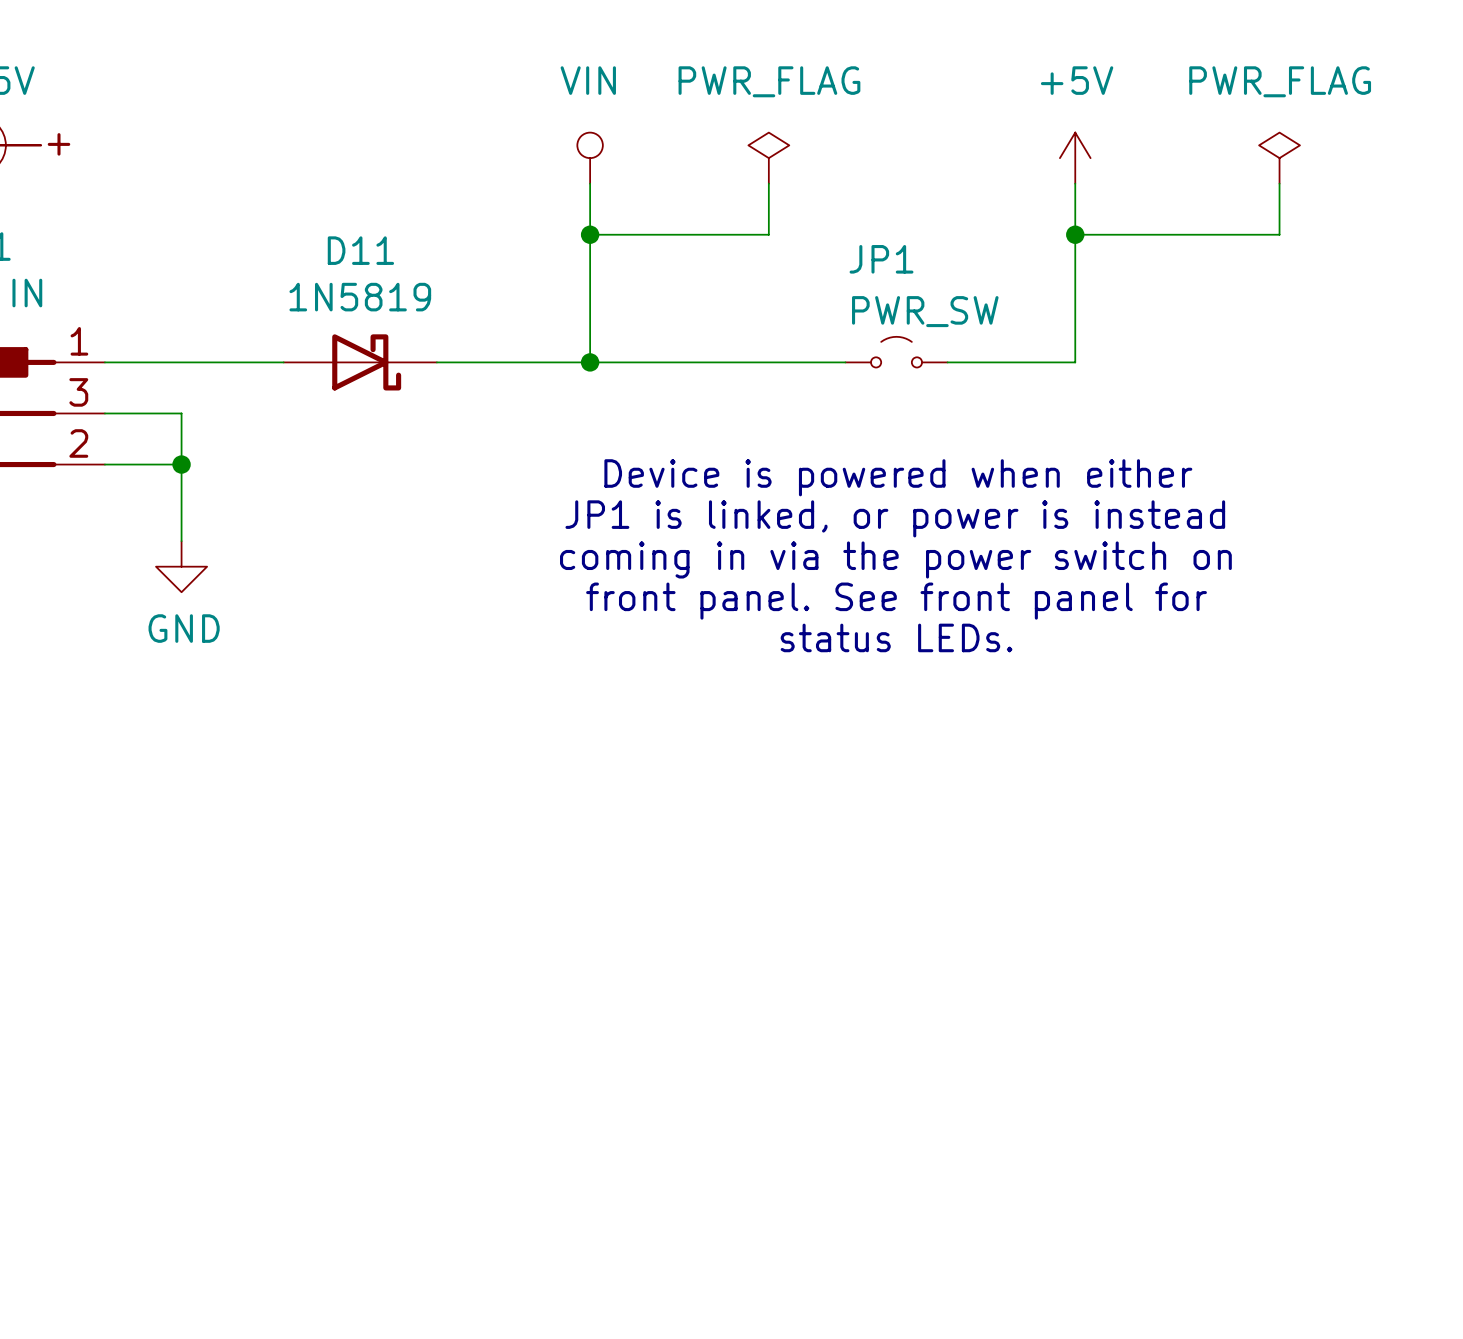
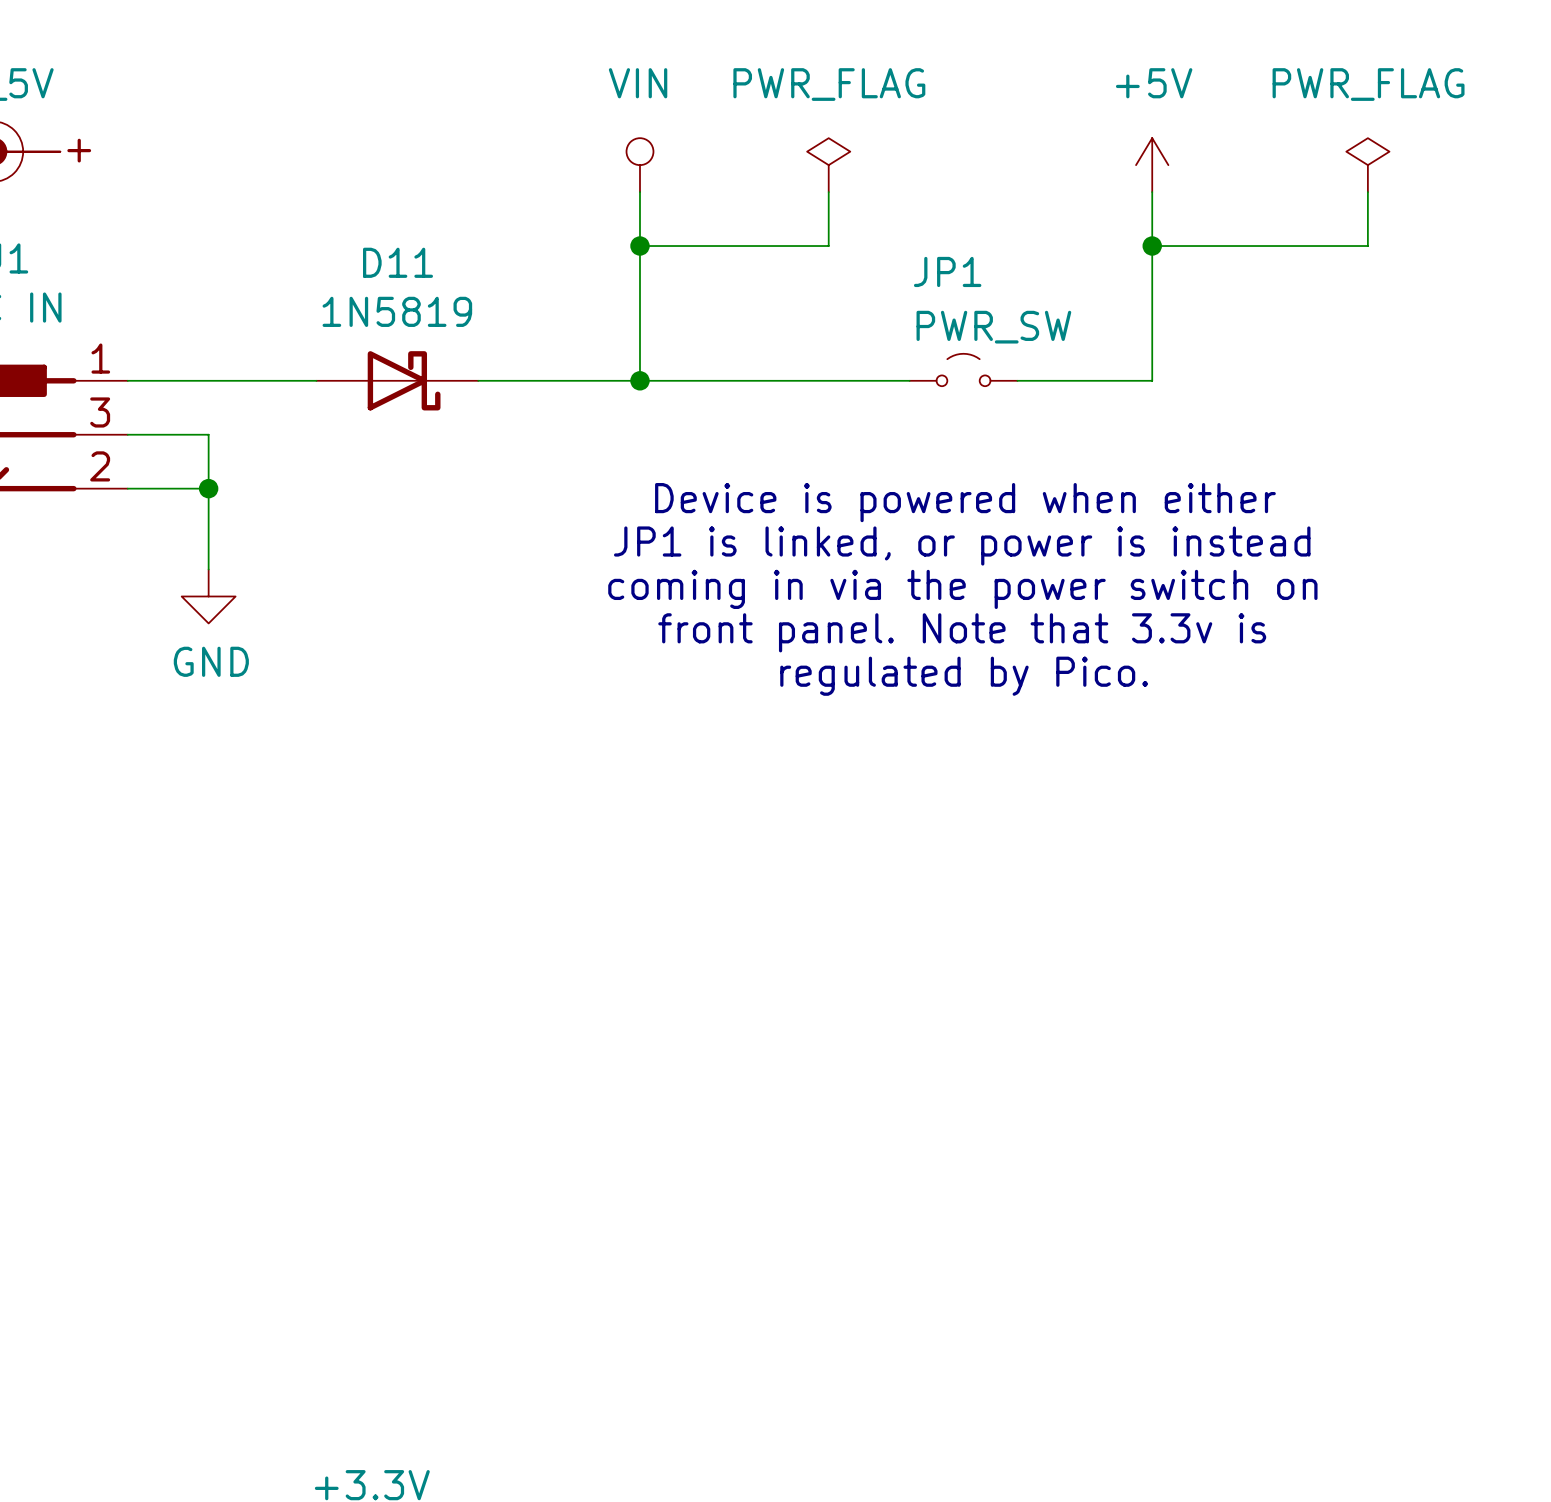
text: front panel. See front panel for (896, 601) -> front panel. Note that 3.3v is (962, 632)
text: status LEDs. (896, 637) -> regulated by Pico. (964, 676)

